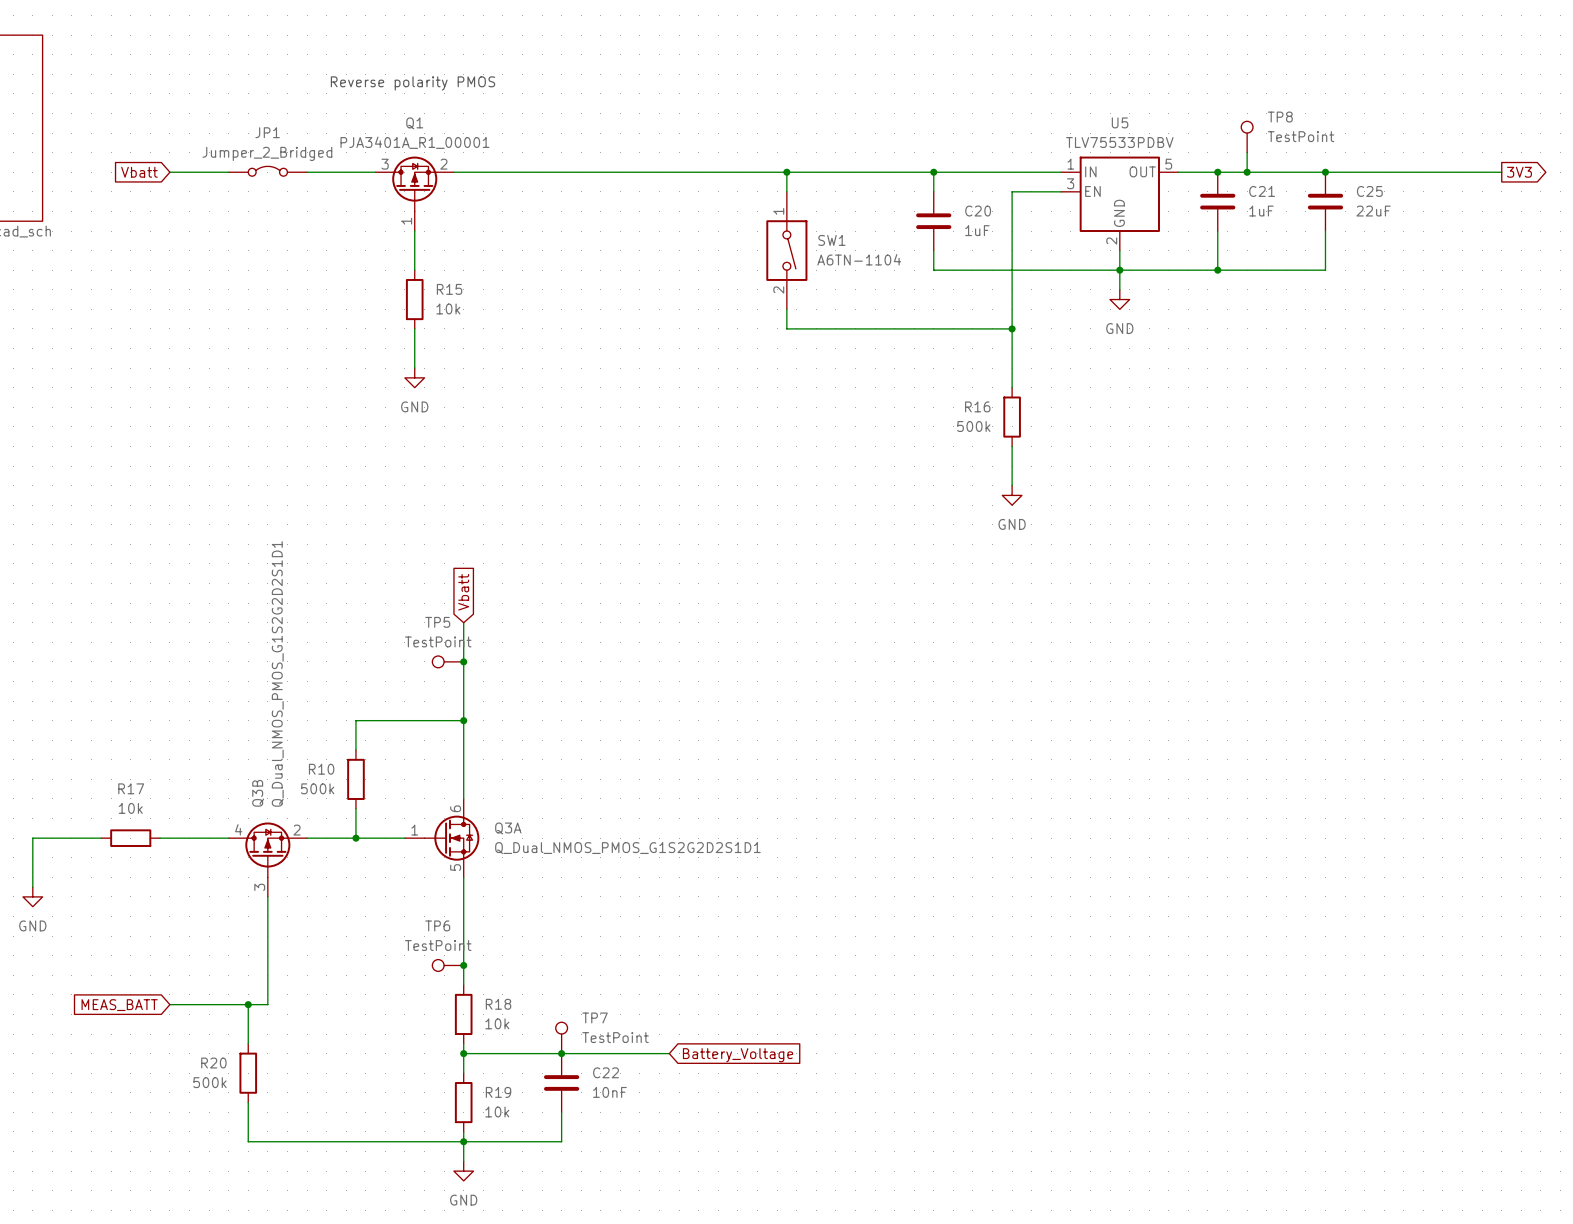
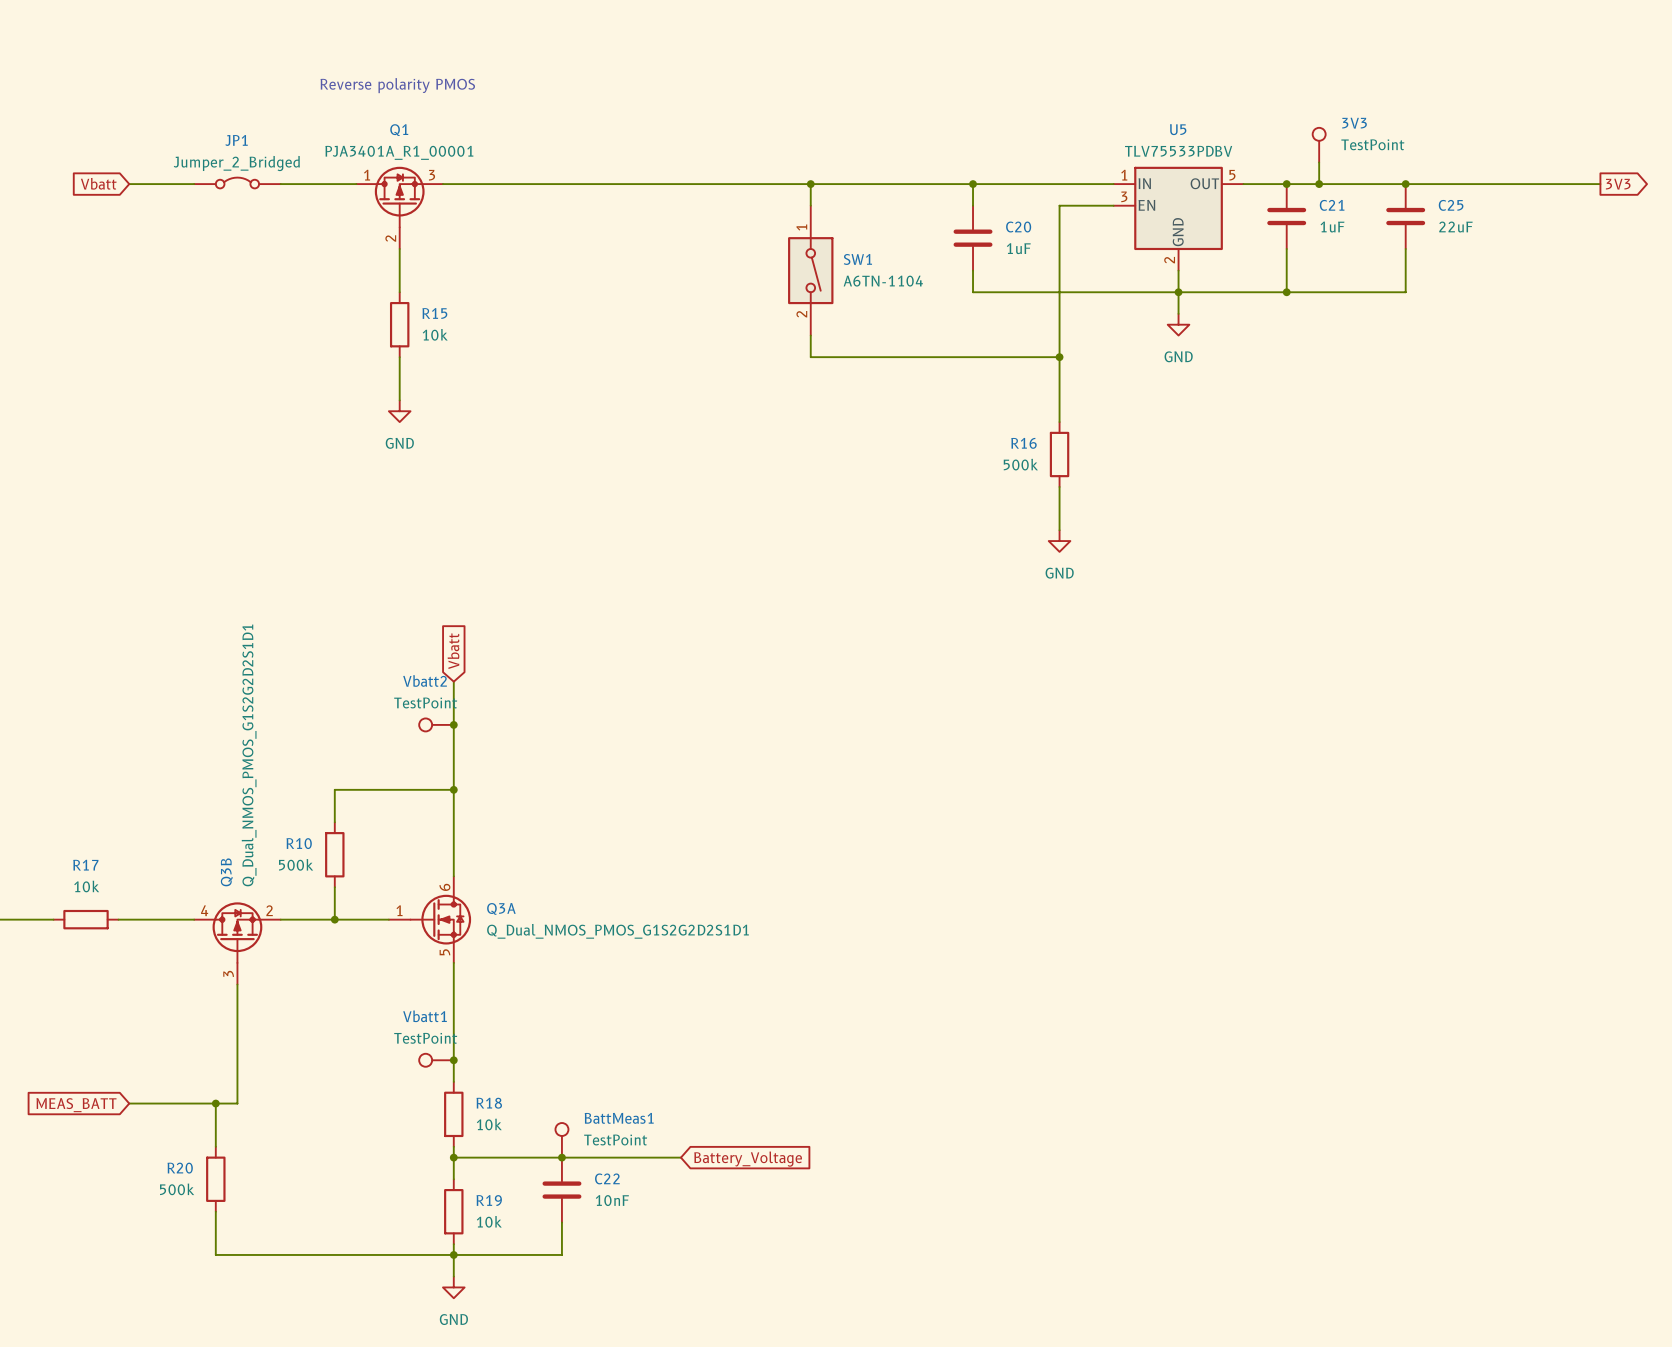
TP8 name: TP8 (1280, 117) -> 3V3 (1354, 123)
Q1 pin number: 3 (385, 164) -> 1 (367, 175)
Q1 pin number: 2 (443, 164) -> 3 (432, 175)
Q1 pin number: 1 (406, 221) -> 2 (390, 238)
TP5 name: TP5 (437, 622) -> Vbatt2 (425, 680)
TP6 name: TP6 (437, 925) -> Vbatt1 (425, 1016)
TP7 name: TP7 (595, 1017) -> BattMeas1 (619, 1118)

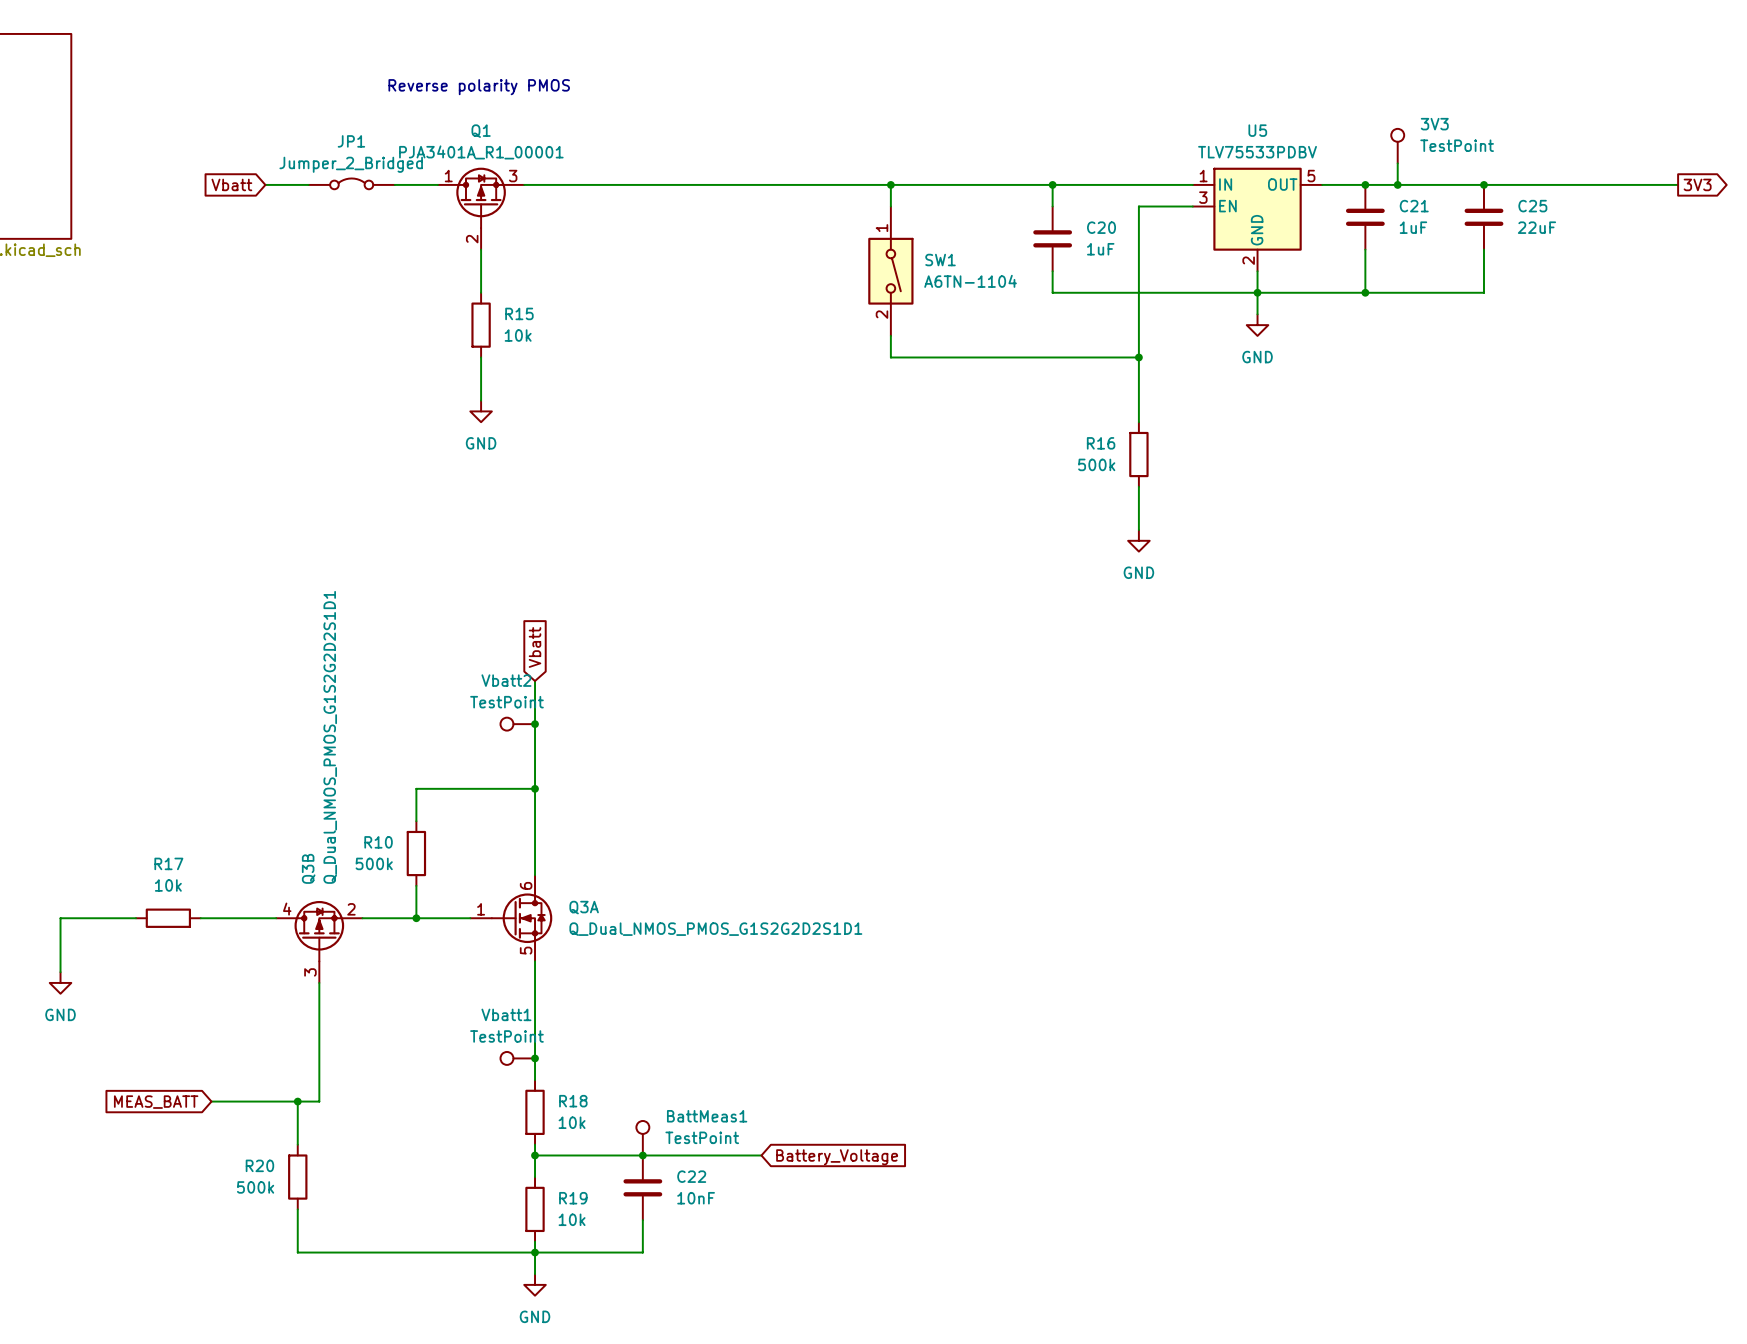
global label position: Vbatt (98, 183) -> Vbatt (231, 184)
JP1 position: (237, 183) -> (351, 183)
wire: (129, 184) (183, 184) -> none

